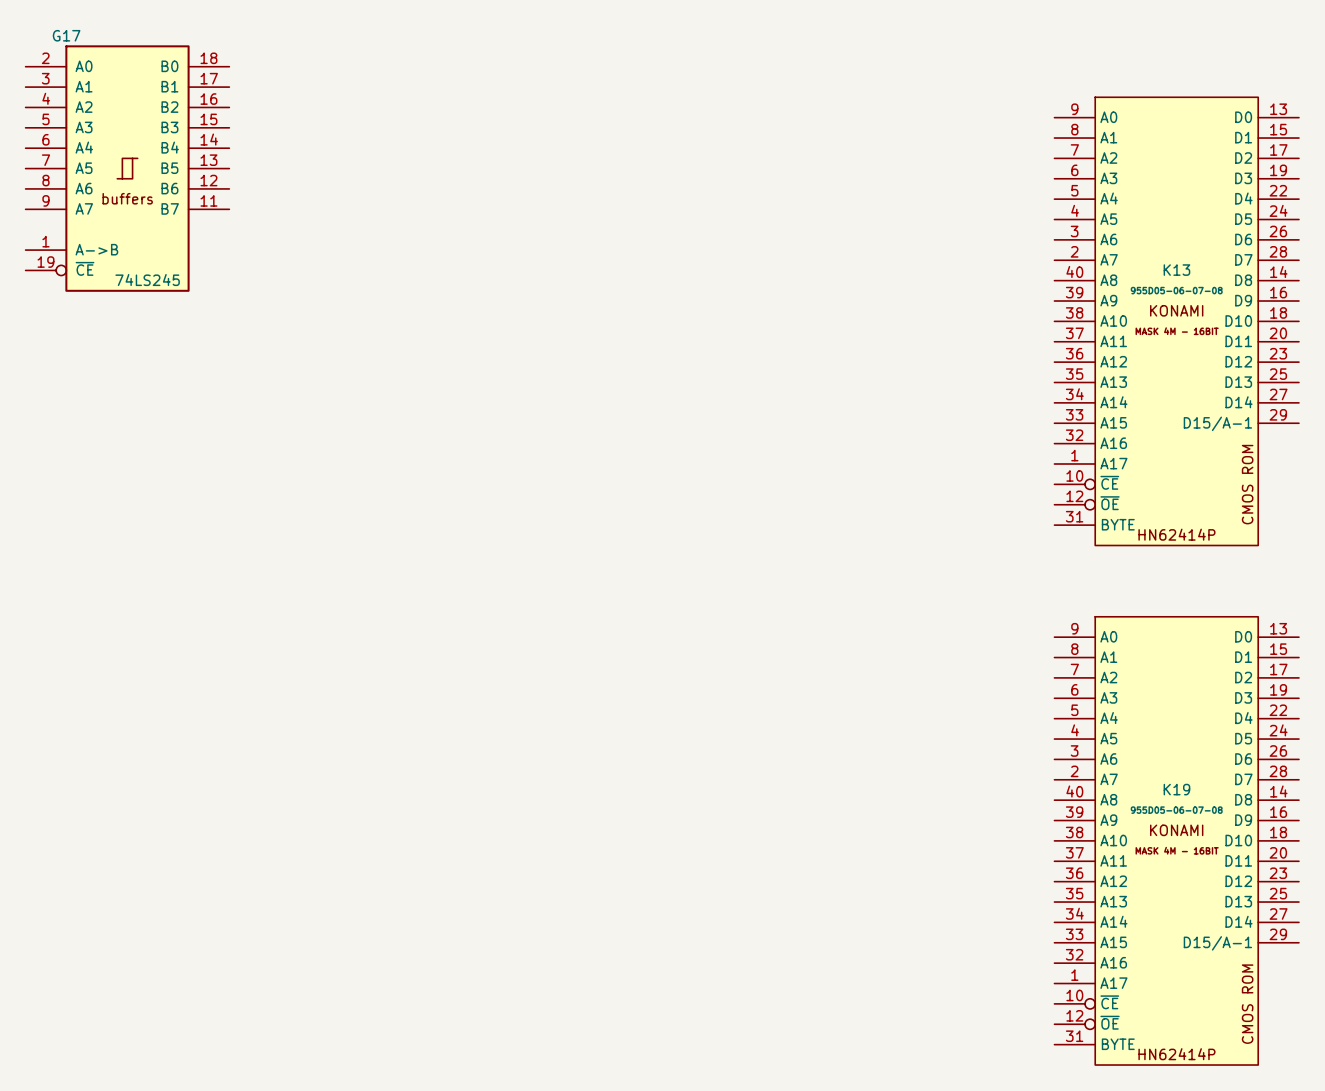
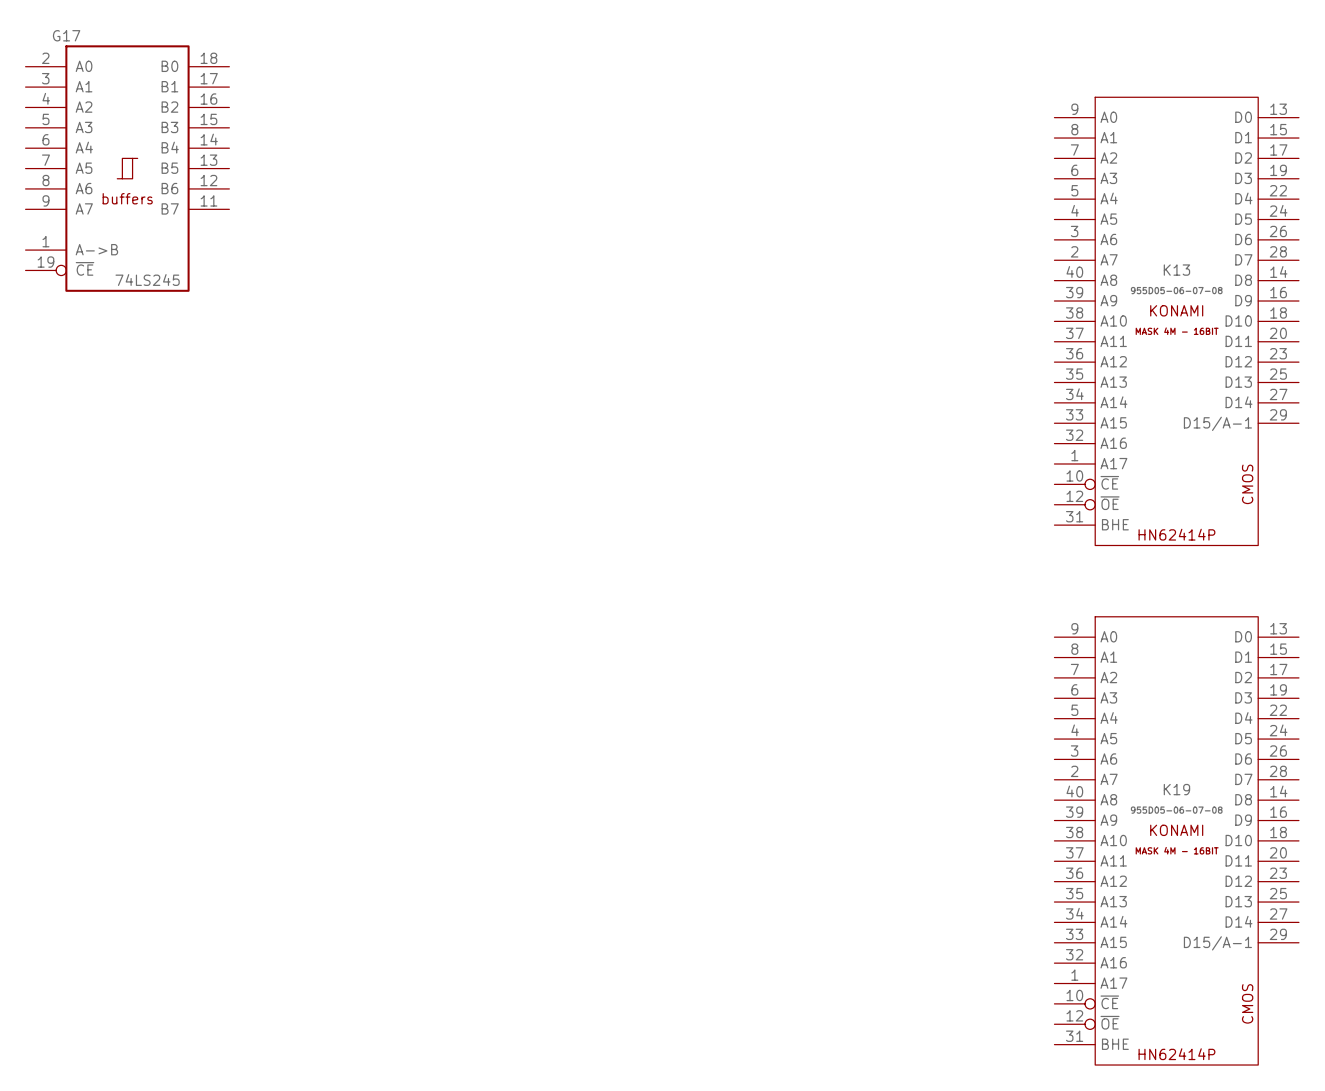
K13 text: CMOS ROM (1247, 484) -> CMOS (1247, 484)
K13 pin name: BYTE (1118, 524) -> BHE (1115, 524)
K19 text: CMOS ROM (1247, 1004) -> CMOS (1247, 1003)
K19 pin name: BYTE (1118, 1044) -> BHE (1115, 1044)

